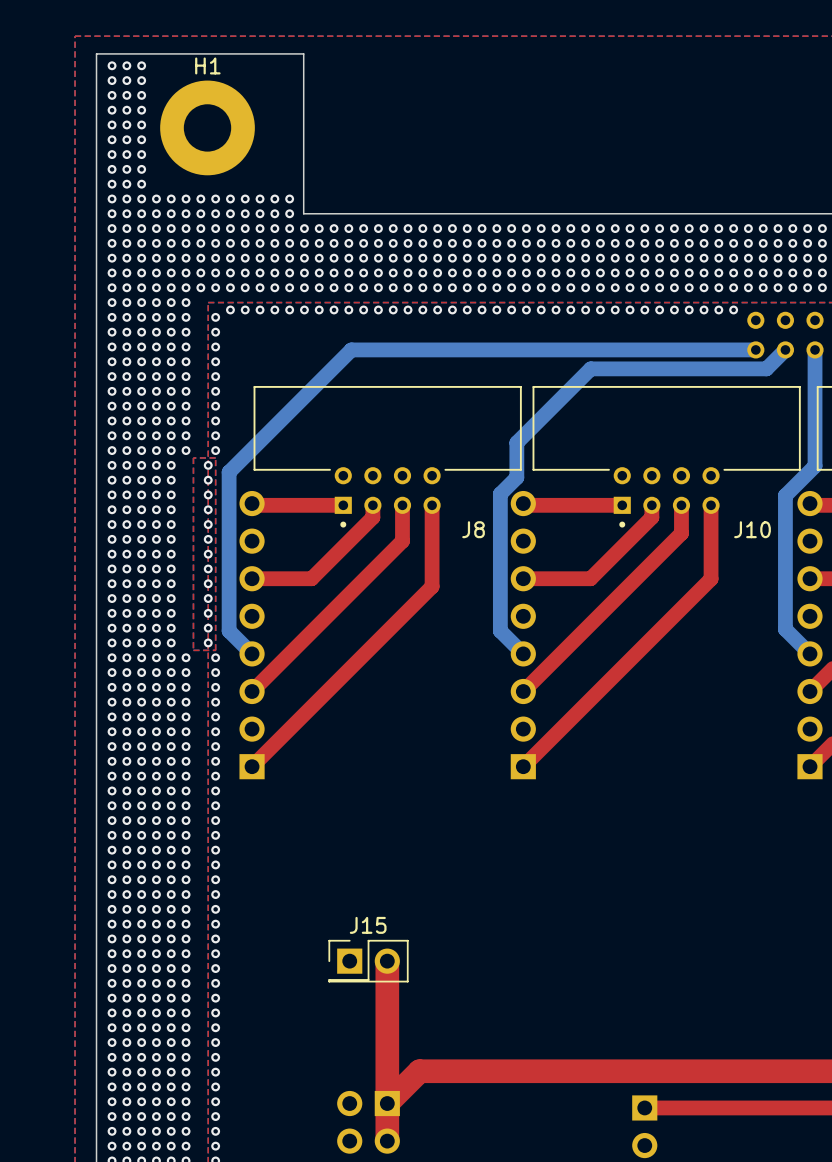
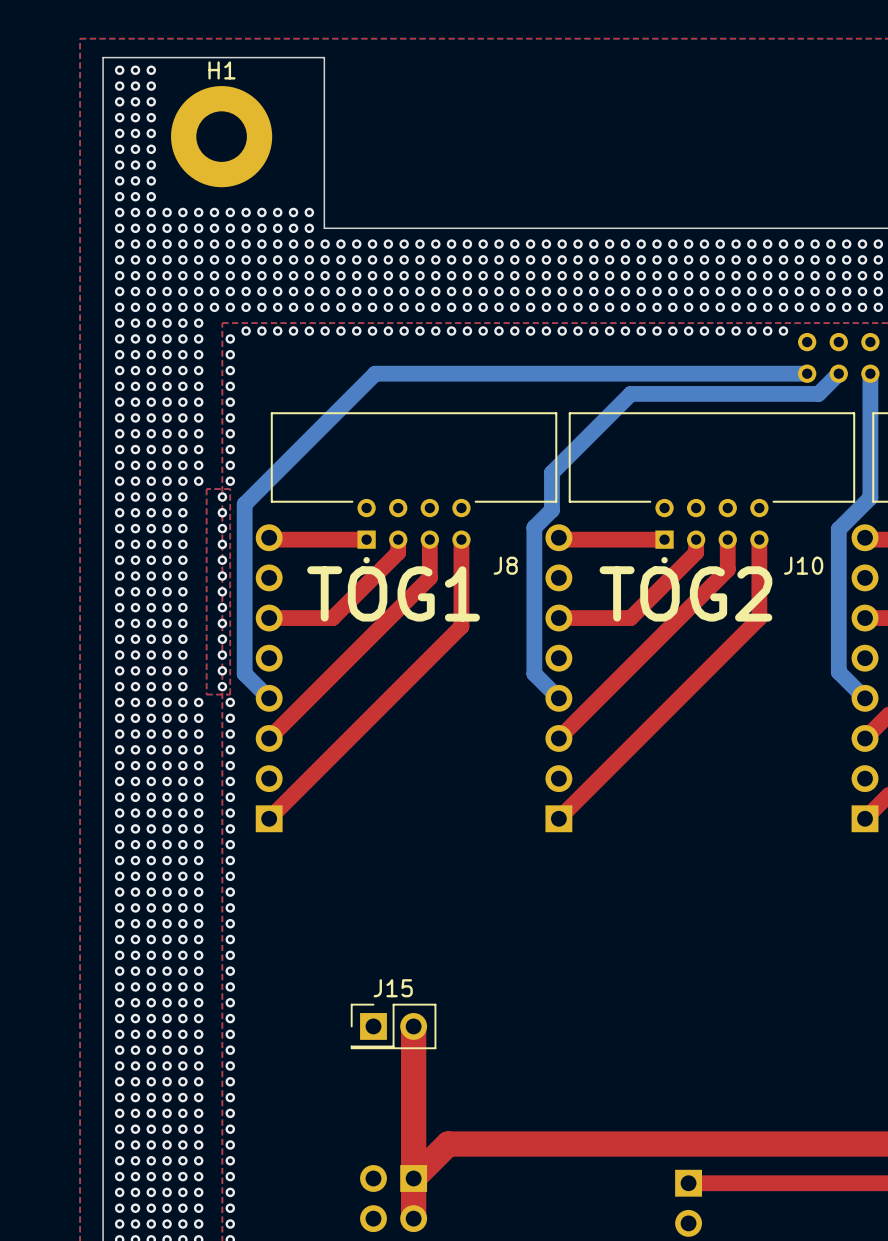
text: none -> TOG1 (393, 593)
text: none -> TOG2 (685, 593)

